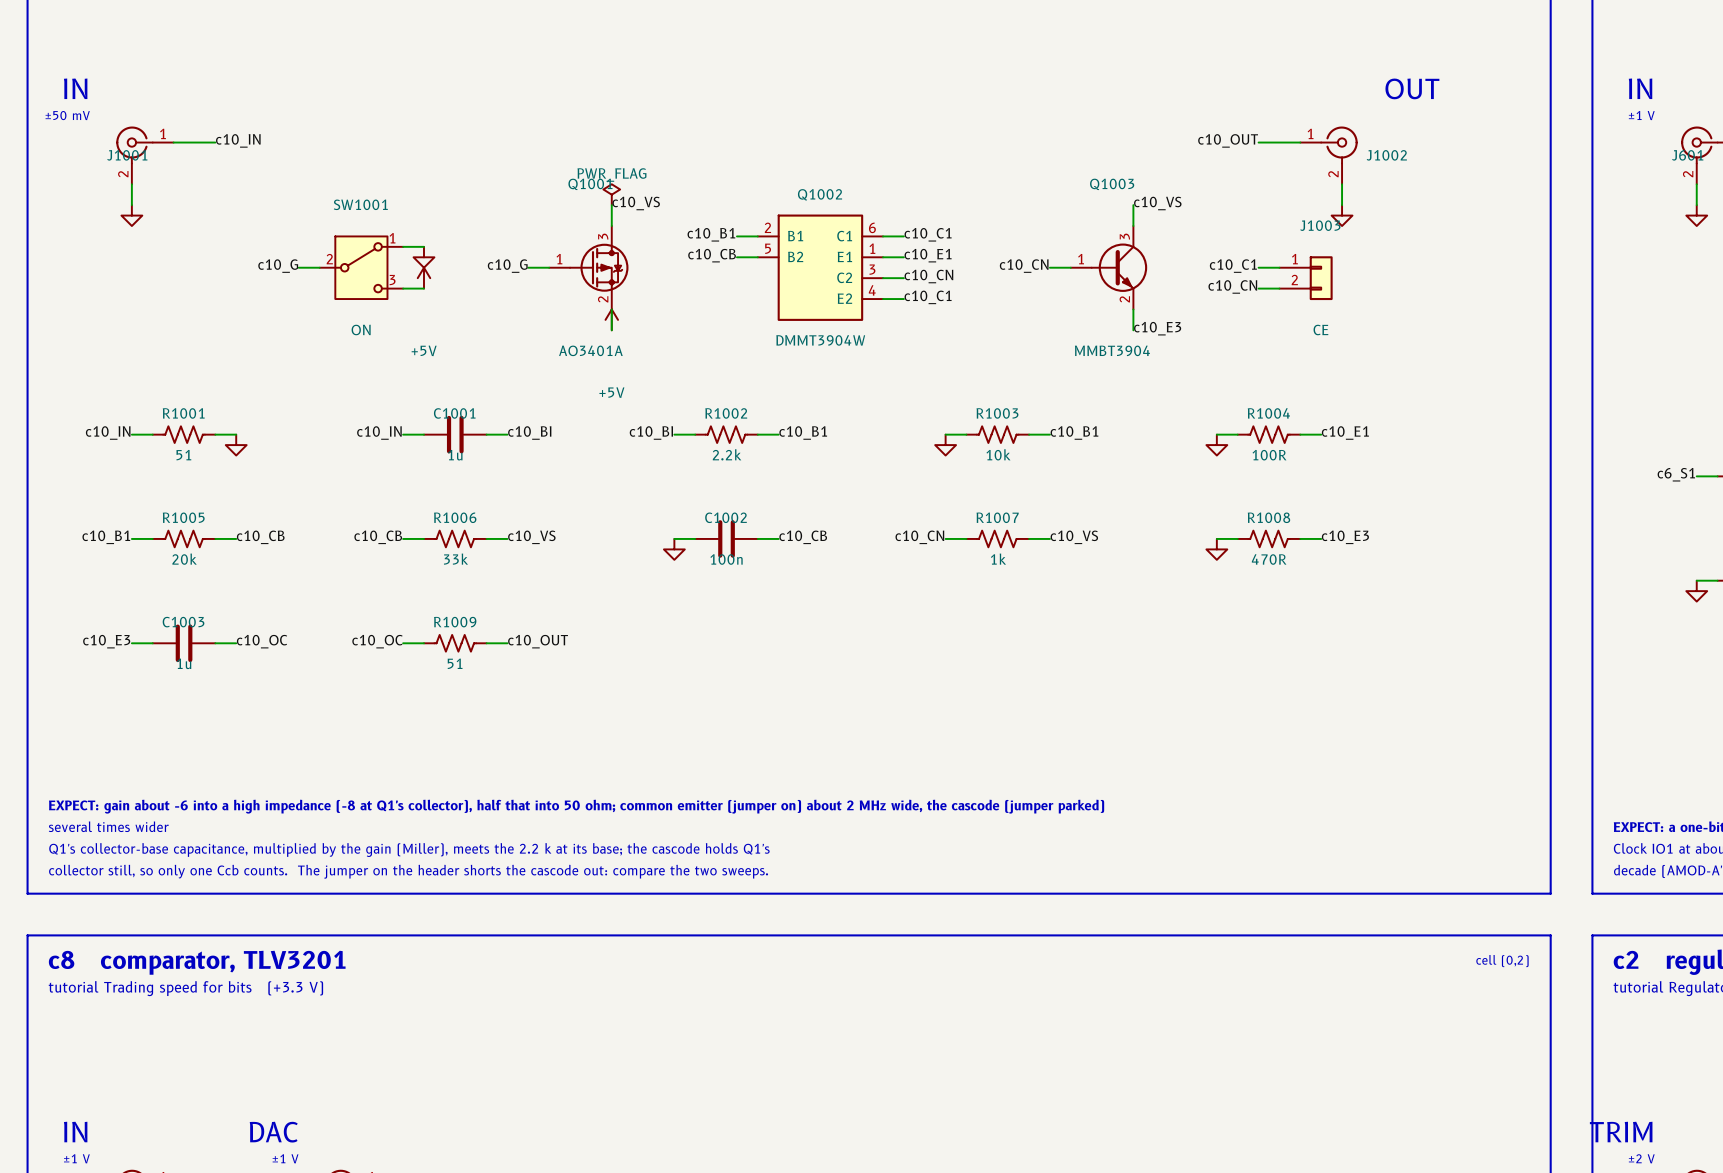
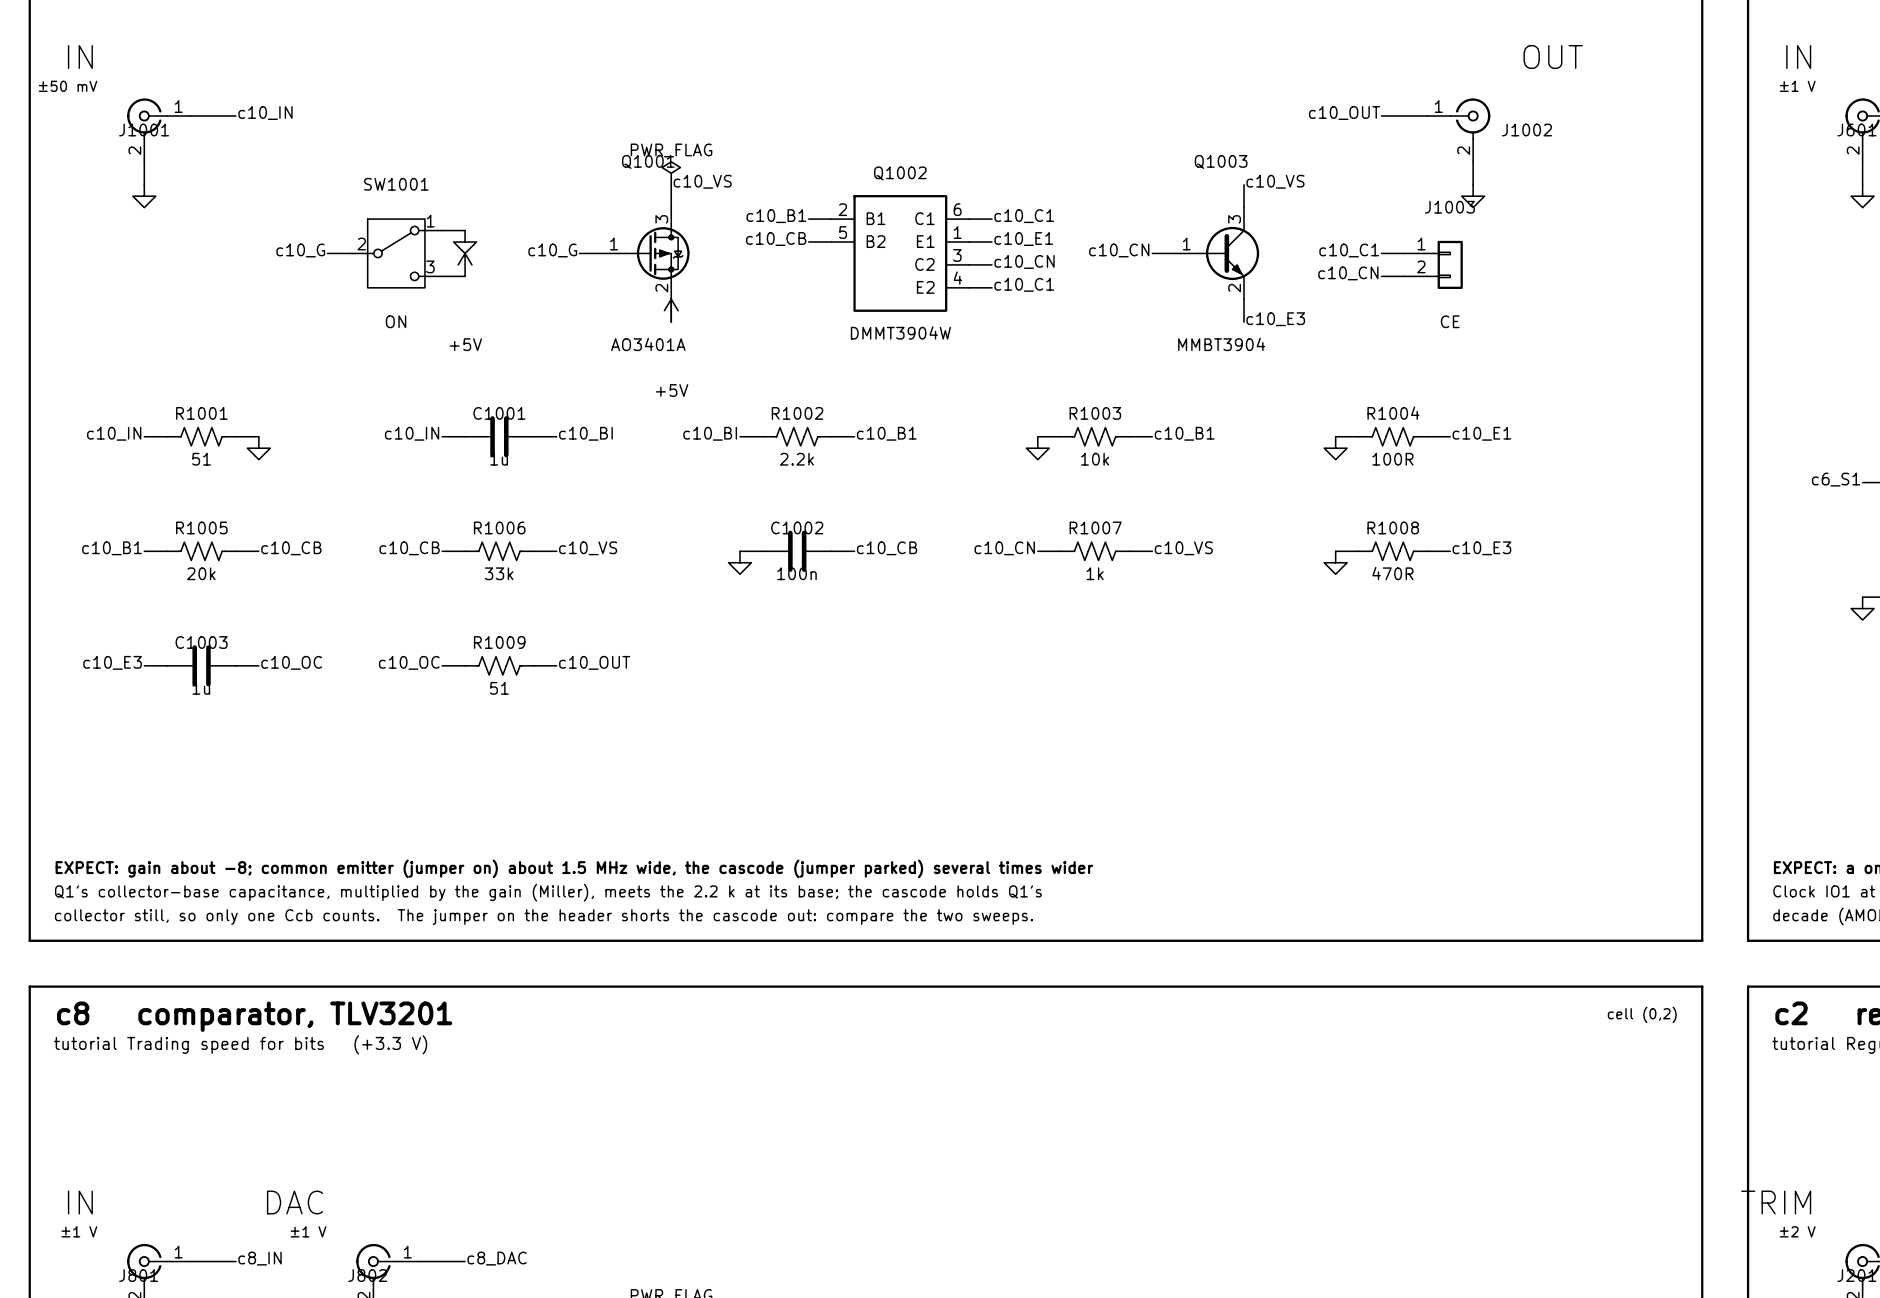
text: EXPECT: gain about -6 into a high impedance (-8 at Q1's collector), half that into 50 ohm; common emitter (jumper on) about 2 MHz wide, the cascode (jumper parked) (576, 806) -> none
text: several times wider (108, 826) -> EXPECT: gain about -8; common emitter (jumper on) about 1.5 MHz wide, the cascode (jumper parked) several times wider (574, 868)

